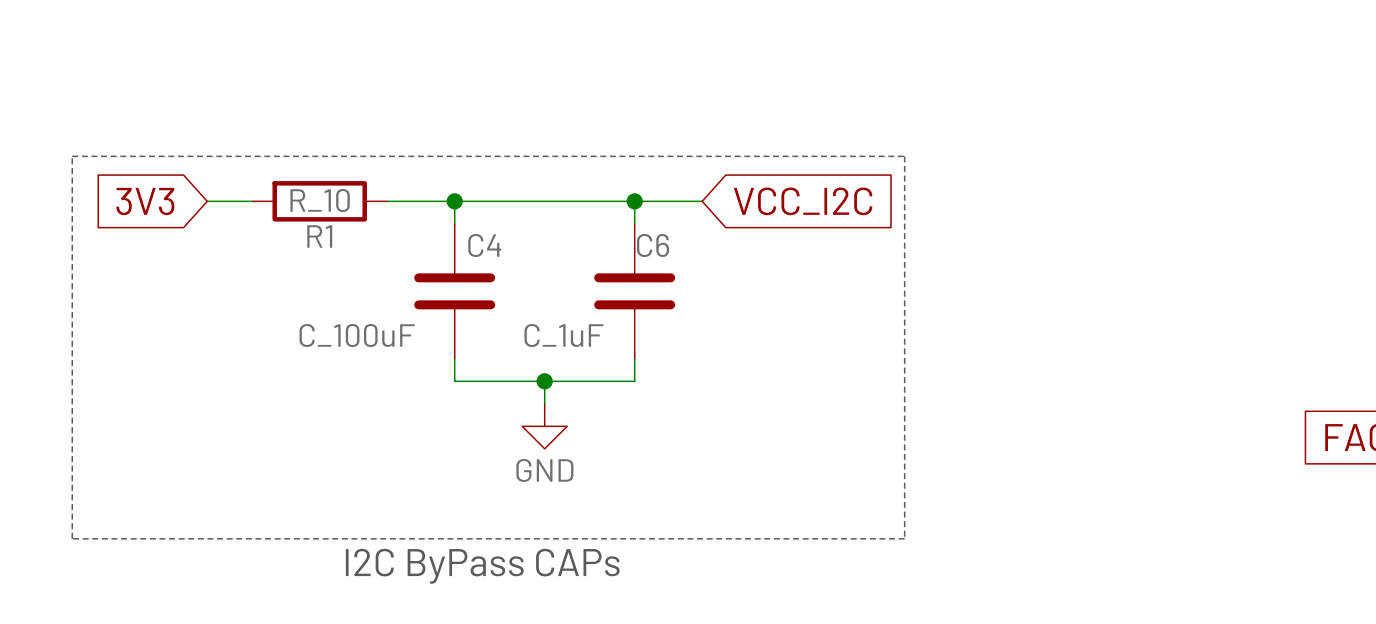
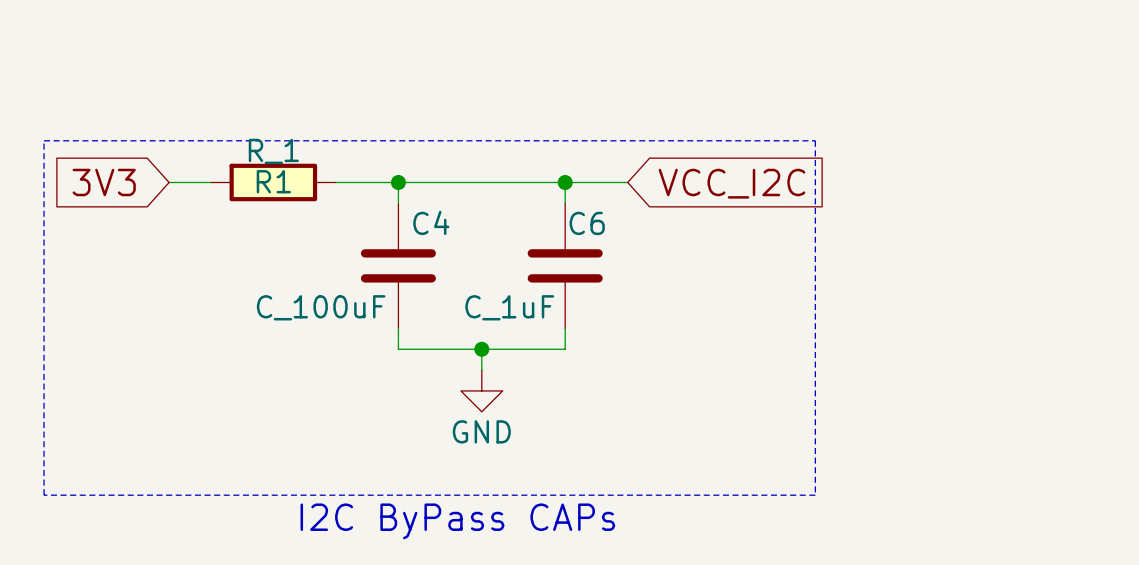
R1 value: R_10 (320, 200) -> R_1 (273, 151)
R1 name position: R1 (319, 236) -> R1 (273, 181)

